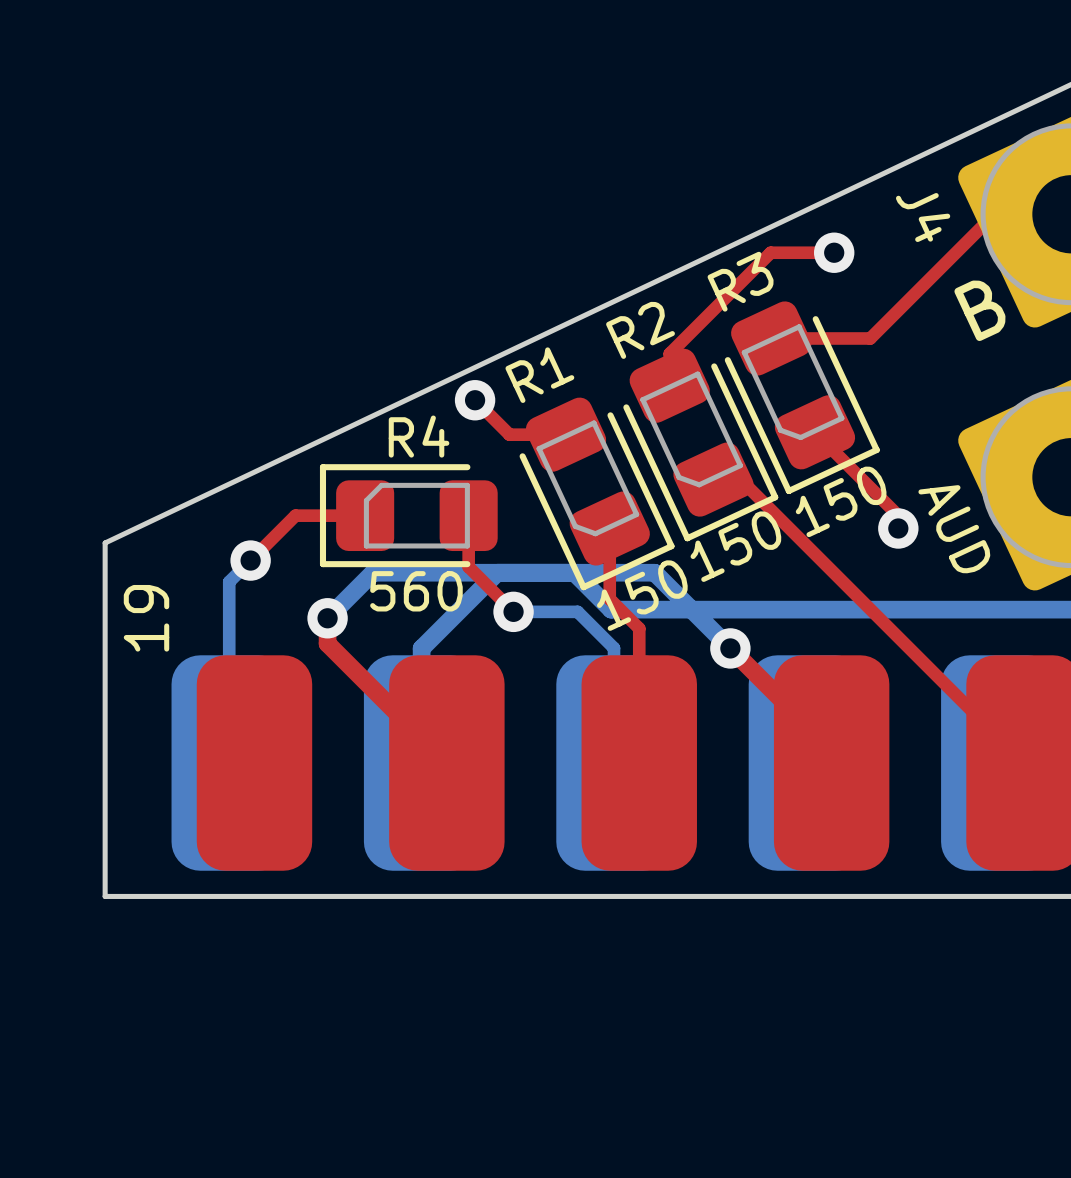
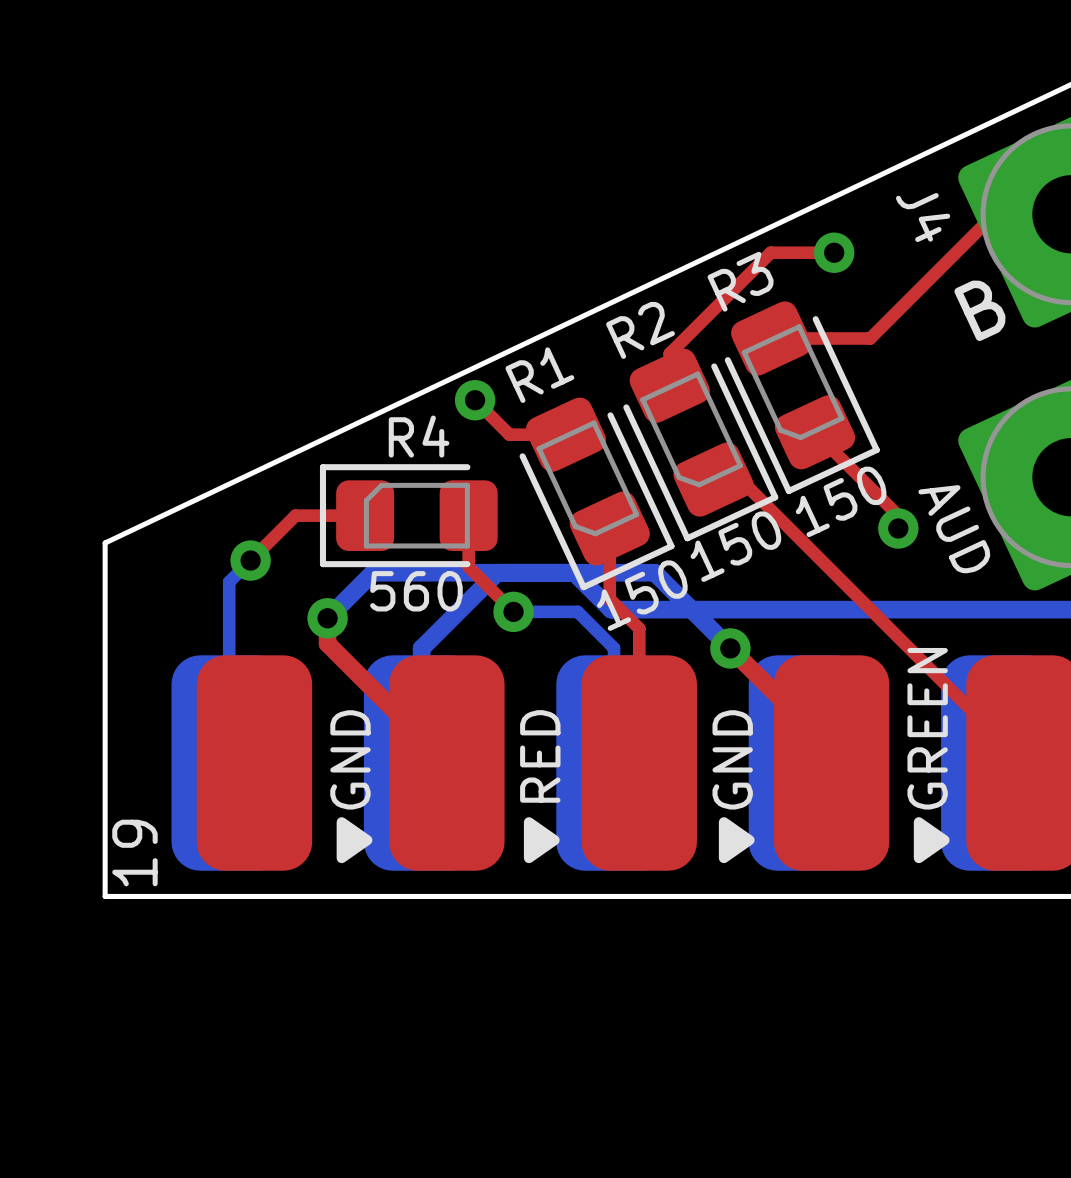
text position: 19 (146, 618) -> 19 (134, 852)
text: none -> GREEN (927, 728)
text: none -> RED (540, 756)
text: none -> GND (350, 759)
text: none -> GND (732, 759)
drawing: none -> [336, 817, 373, 864]
drawing: none -> [523, 817, 560, 864]
drawing: none -> [718, 817, 755, 864]
drawing: none -> [913, 817, 950, 864]

